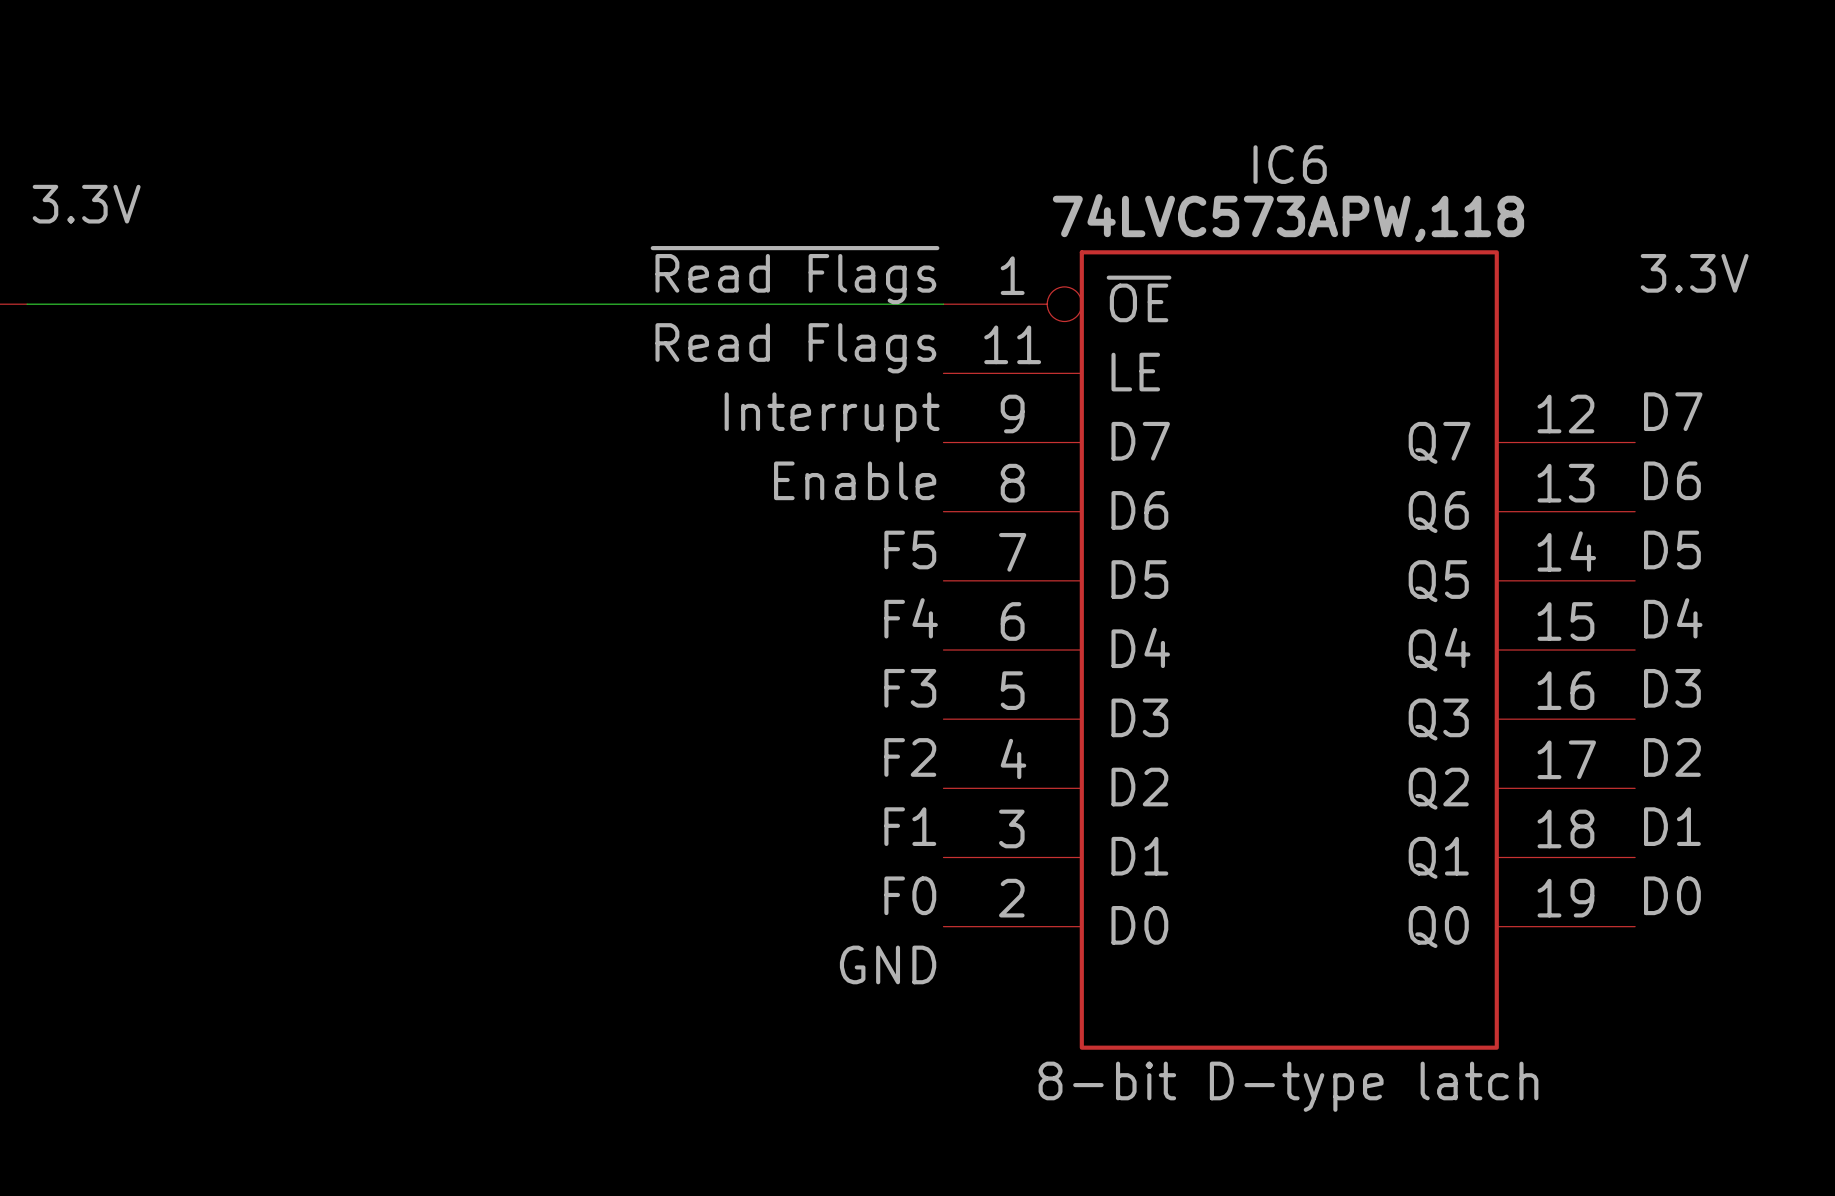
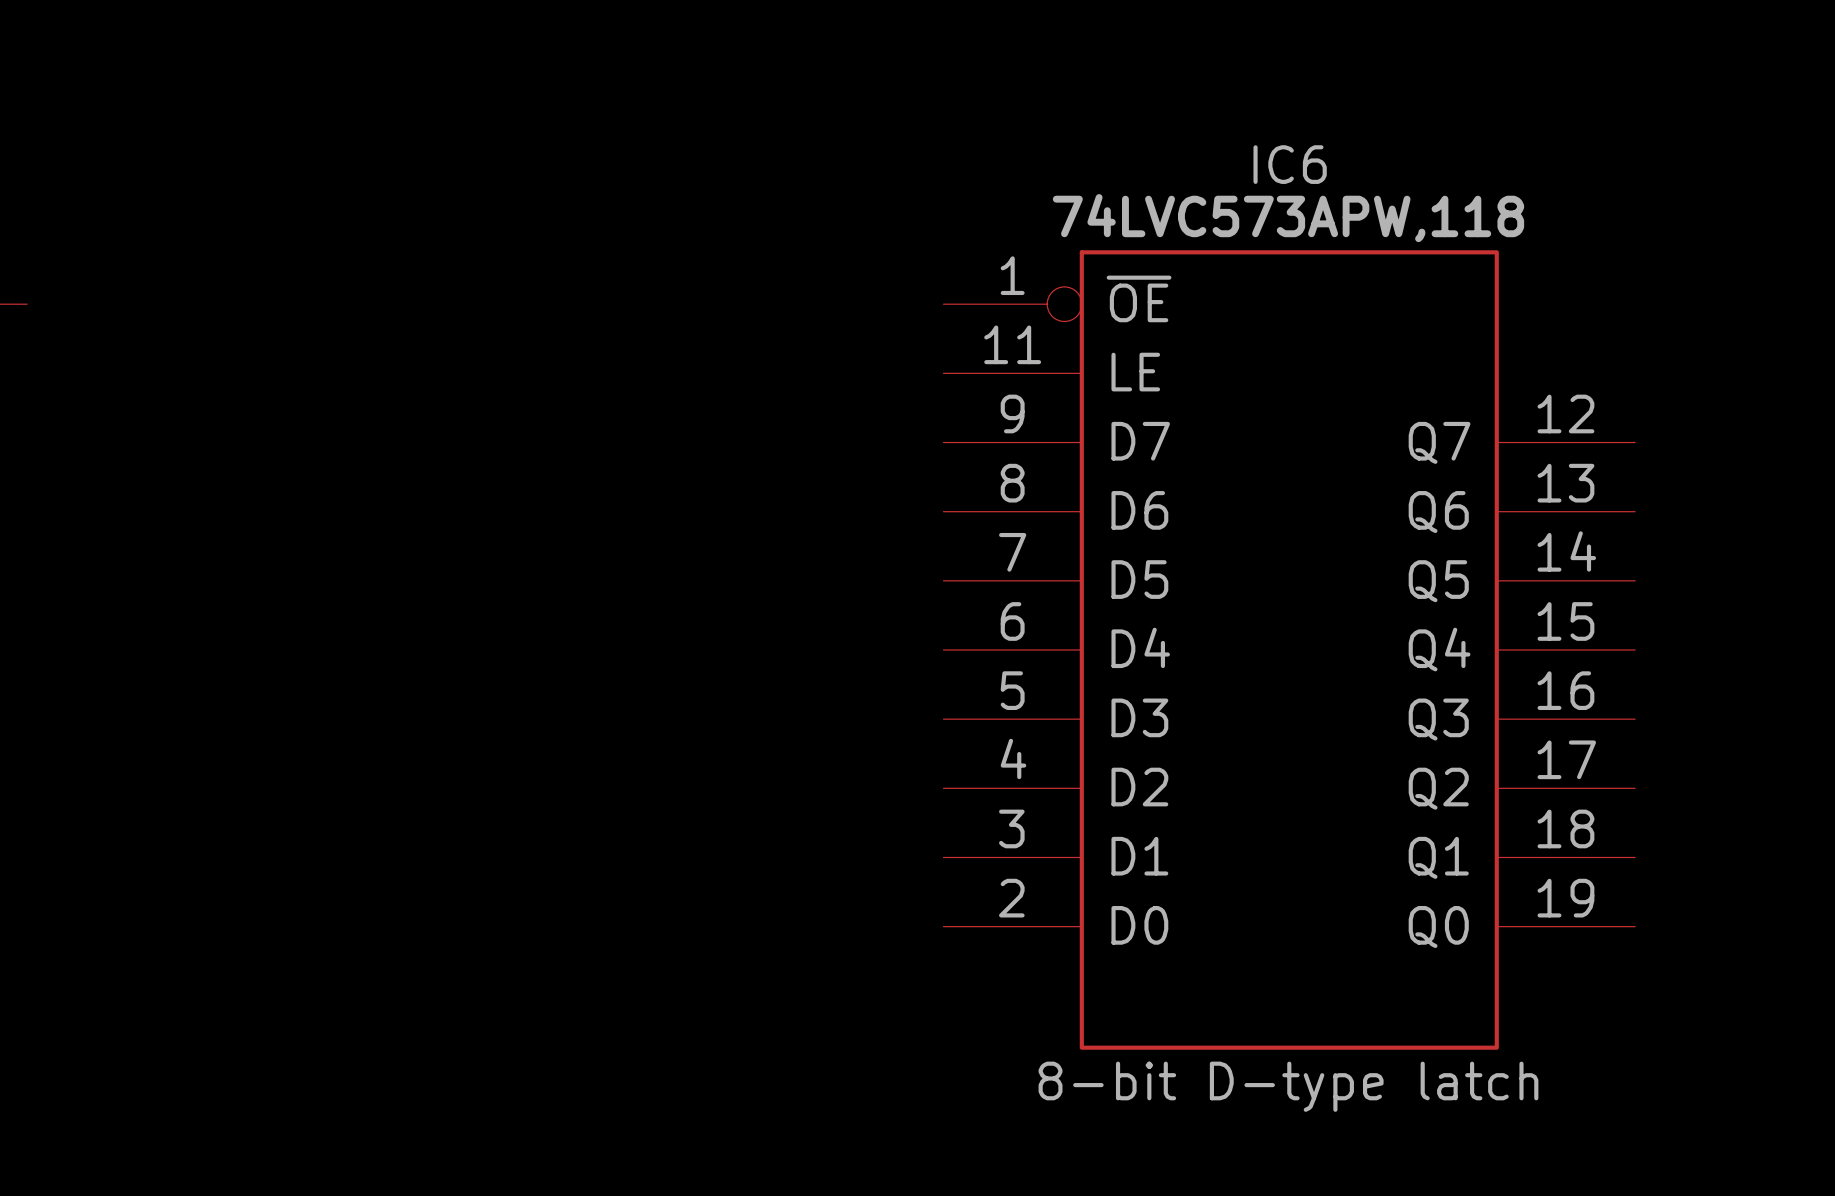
label: 3.3V (86, 204) -> none
label: 3.3V (1694, 273) -> none
label: ~{Read Flags} (795, 275) -> none
wire: (27, 304) (943, 304) -> none
label: Read Flags (795, 348) -> none
label: D7 (1673, 411) -> none
label: Interrupt (832, 417) -> none
label: Enable (855, 480) -> none
label: D6 (1672, 480) -> none
label: F5 (910, 549) -> none
label: D5 (1672, 549) -> none
label: F4 (911, 618) -> none
label: D4 (1673, 618) -> none
label: F3 (910, 688) -> none
label: D3 (1672, 688) -> none
label: F2 (910, 757) -> none
label: D2 (1672, 757) -> none
label: F1 (910, 826) -> none
label: D1 (1672, 826) -> none
label: F0 (910, 895) -> none
label: D0 (1672, 895) -> none
label: GND (888, 964) -> none

